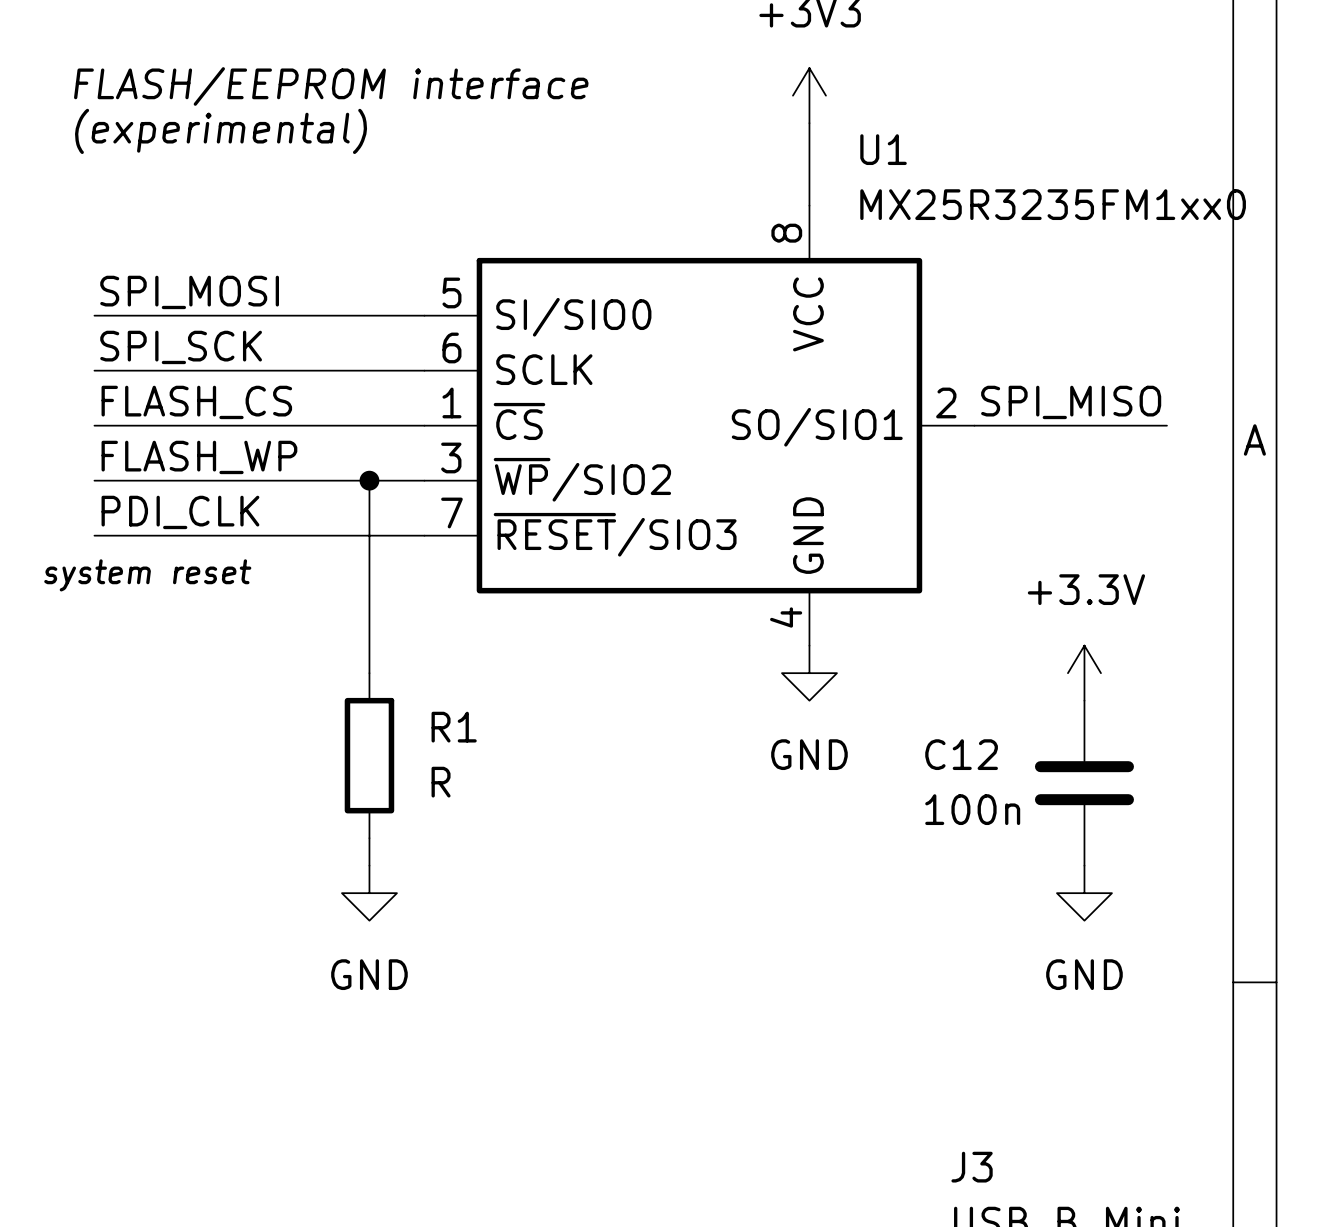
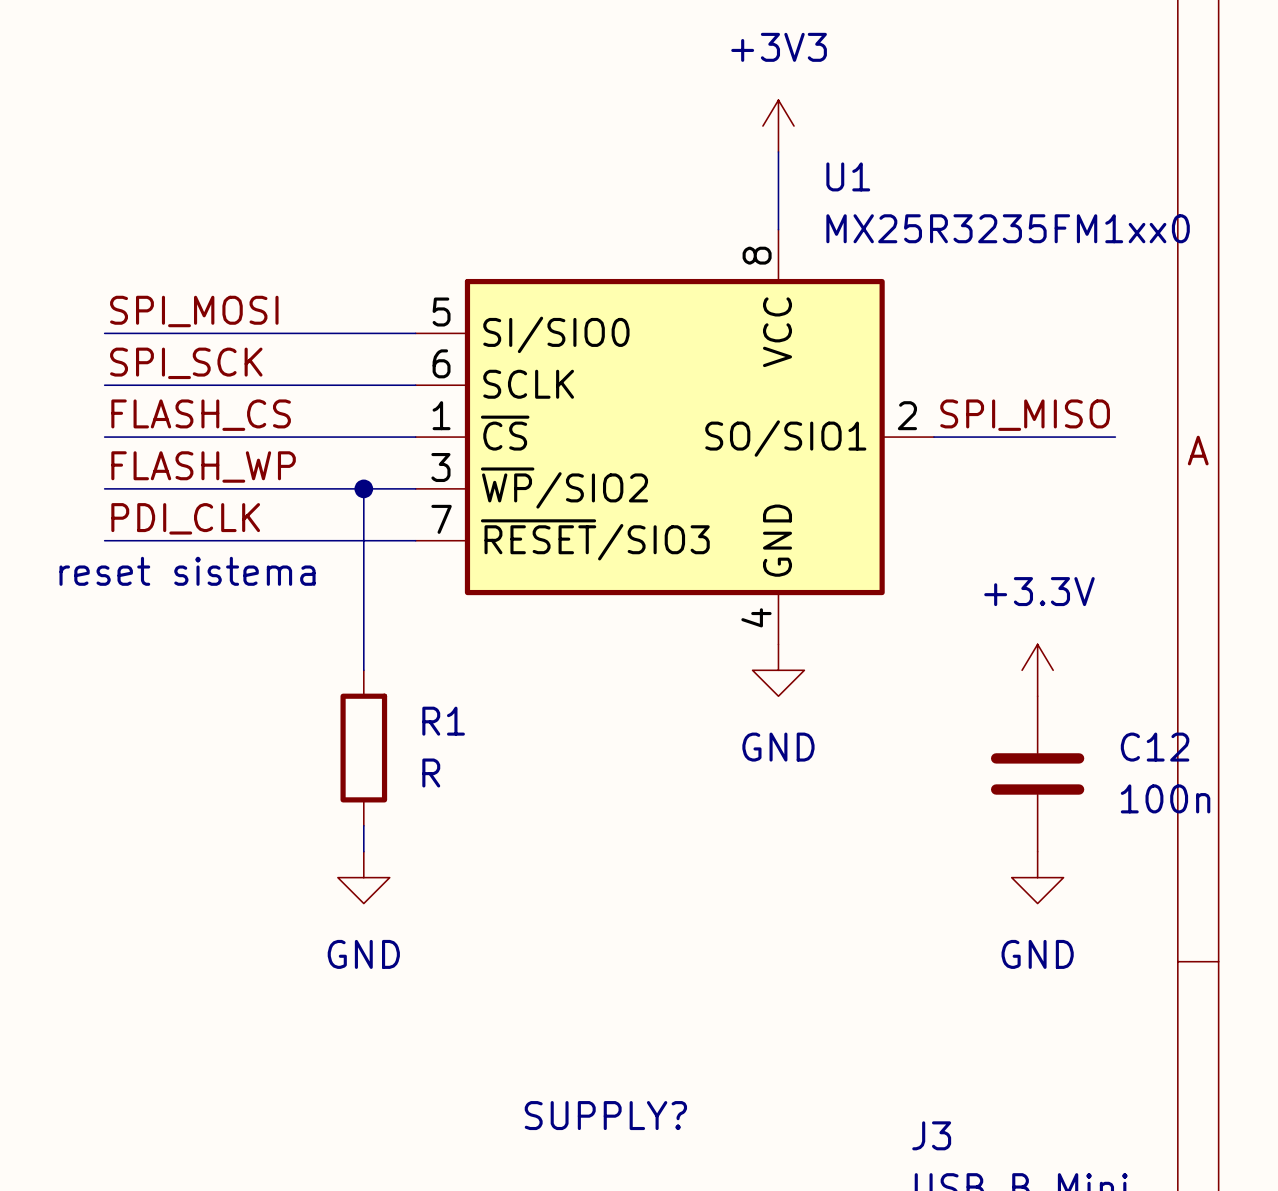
text: FLASH/EEPROM interface (331, 86) -> none
text: (experimental) (221, 131) -> none
text: system reset (147, 575) -> reset sistema (187, 571)
C12 name position: C12 (961, 754) -> C12 (1155, 747)
C12 value position: 100n (972, 809) -> 100n (1165, 798)
text: none -> SUPPLY? (605, 1115)

